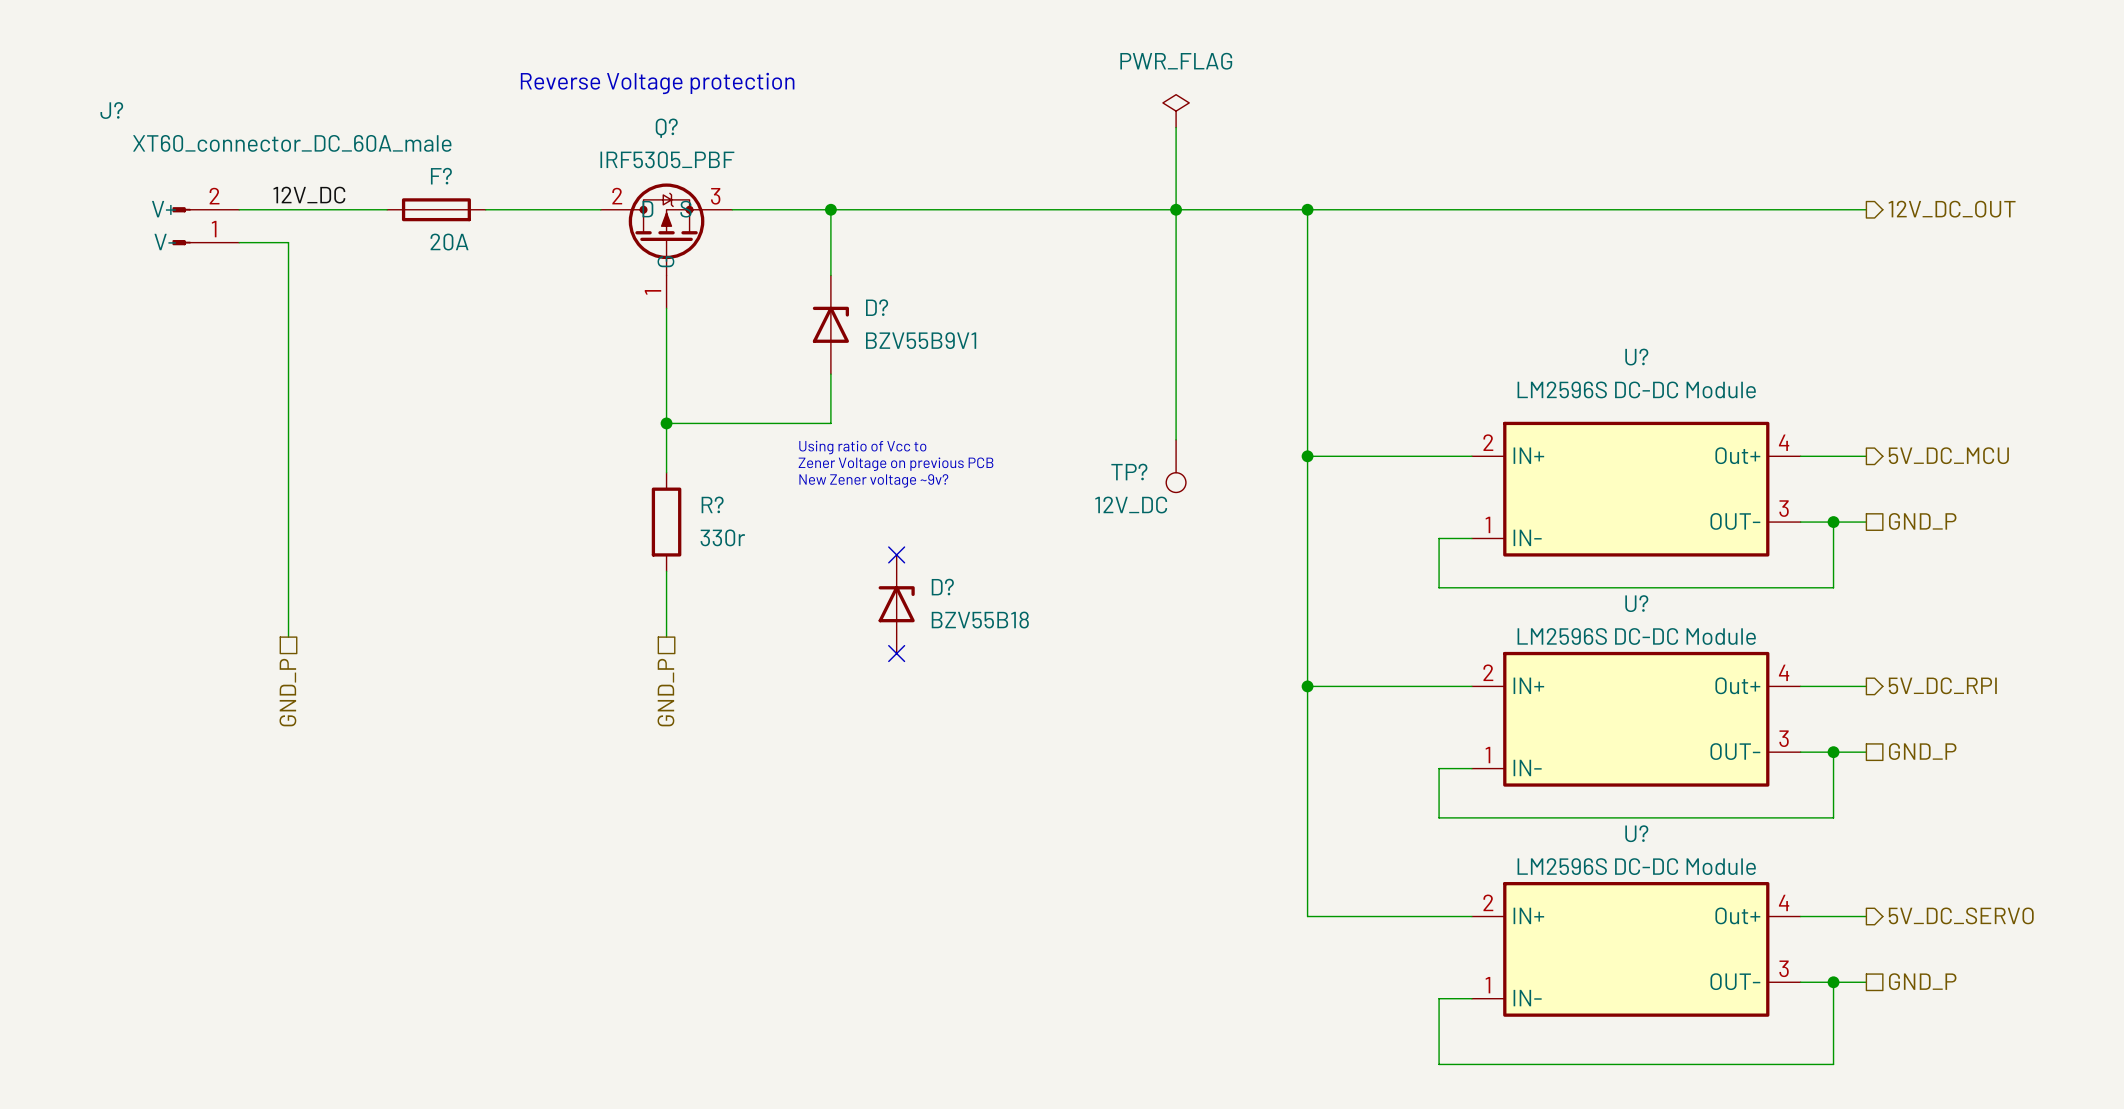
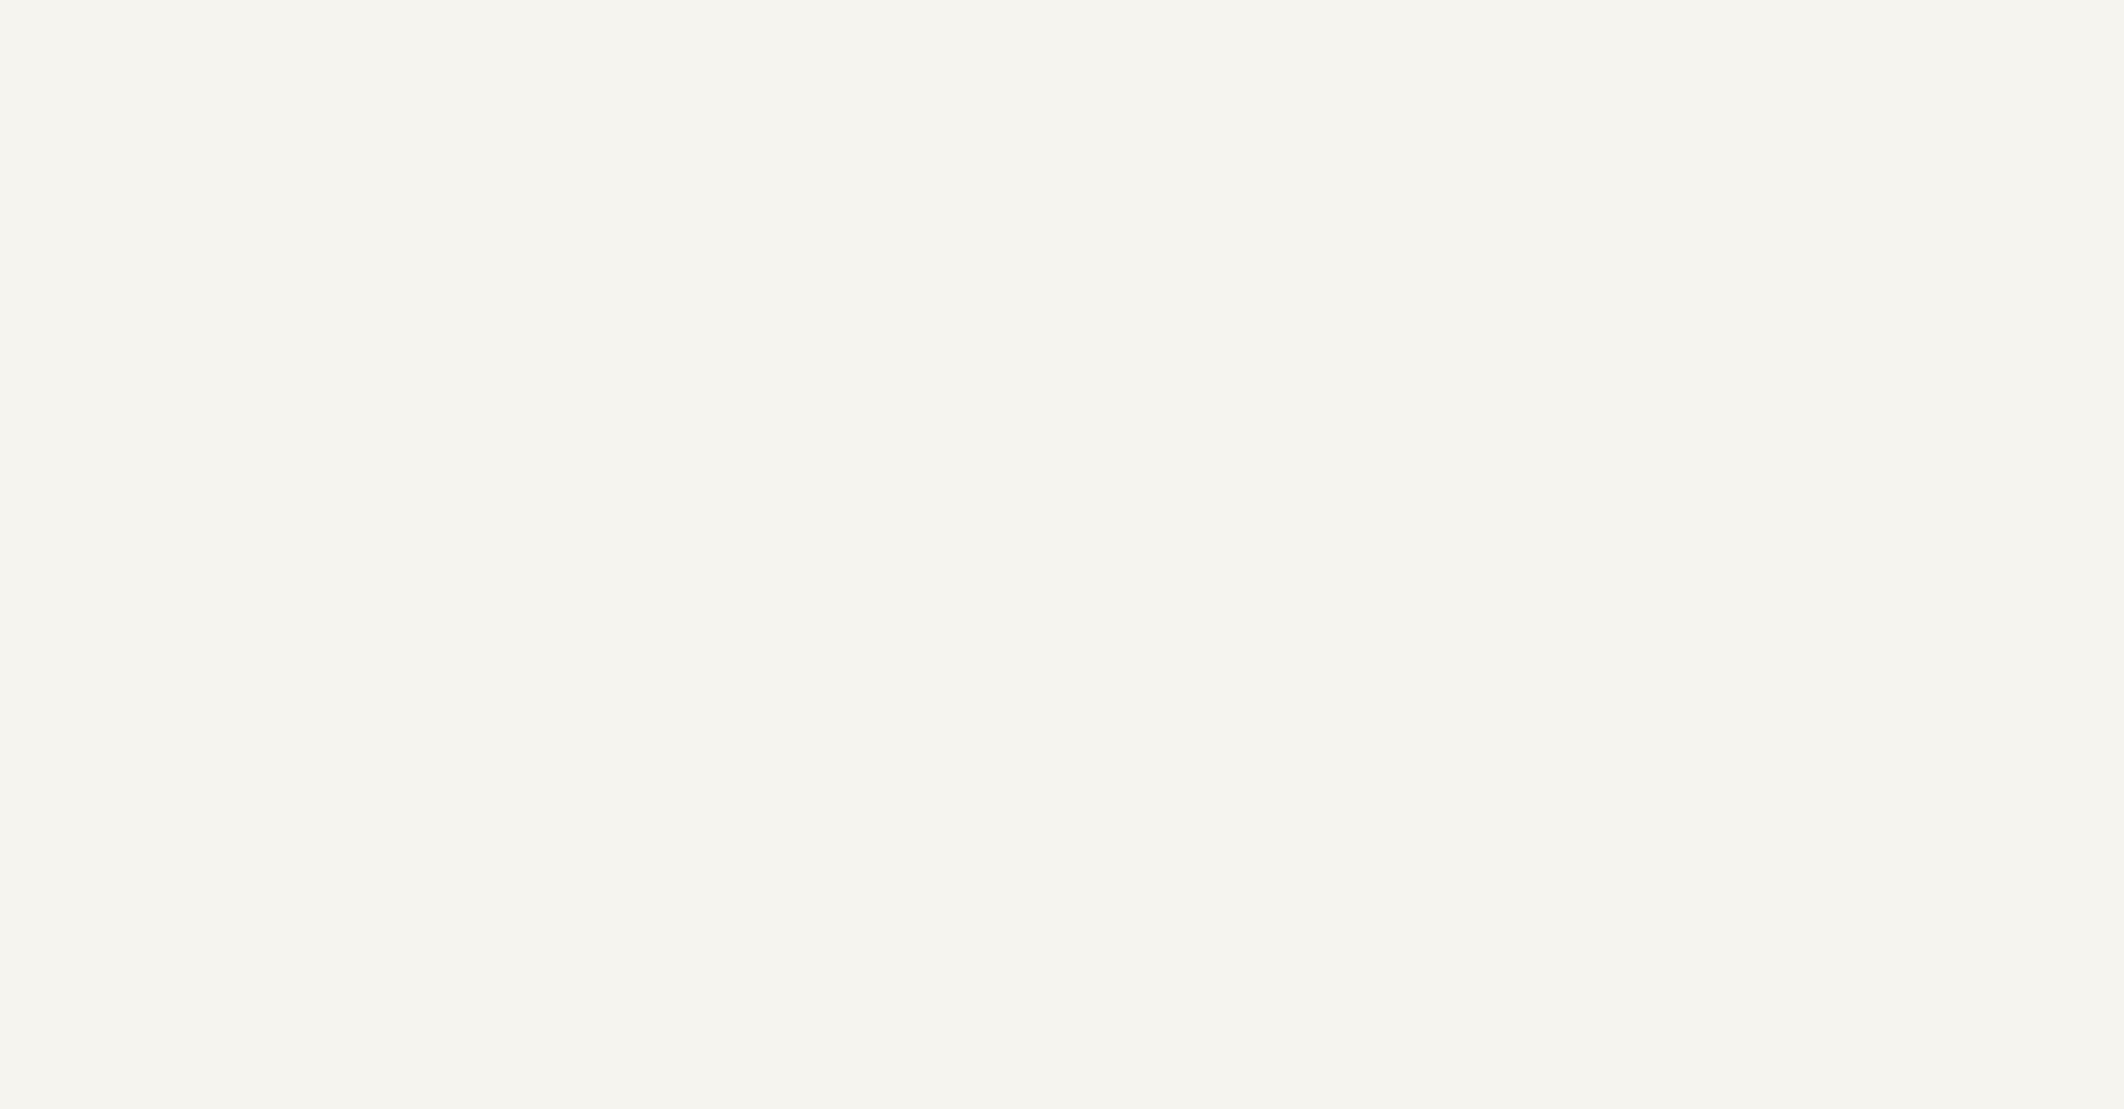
text: Reverse Voltage protection (657, 83) -> none
power symbol: PWR_FLAG (1176, 111) -> none
wire: (1176, 127) (1176, 439) -> none
label: 12V_DC (309, 195) -> none
wire: (239, 209) (387, 209) -> none
F?: 20A (436, 209) -> none
wire: (485, 209) (600, 209) -> none
wire: (732, 209) (1866, 209) -> none
wire: (830, 209) (830, 275) -> none
junction: (830, 209) -> none
junction: (1176, 209) -> none
wire: (1307, 209) (1307, 916) (1471, 916) -> none
junction: (1307, 209) -> none
hierarchical label: 12V_DC_OUT (1952, 209) -> none
J?: XT60_connector_DC_60A_male (205, 226) -> none
wire: (239, 242) (288, 242) (288, 637) -> none
Q?: IRF5305_PBF (666, 245) -> none
wire: (666, 308) (666, 472) -> none
D?: BZV55B9V1 (830, 324) -> none
wire: (830, 374) (830, 423) (666, 423) -> none
junction: (666, 423) -> none
text: Using ratio of Vcc to (862, 447) -> none
hierarchical label: 5V_DC_MCU (1948, 455) -> none
wire: (1307, 456) (1471, 456) -> none
junction: (1307, 456) -> none
wire: (1800, 456) (1866, 456) -> none
text: Zener Voltage on previous PCB (896, 464) -> none
TP?: 12V_DC (1176, 466) -> none
text: New Zener voltage ~9v? (873, 480) -> none
U?: LM2596S DC-DC Module (1636, 489) -> none
hierarchical label: GND_P (1922, 521) -> none
R?: 330r (666, 522) -> none
wire: (1800, 522) (1866, 522) -> none
wire: (1833, 522) (1833, 587) (1439, 587) (1439, 538) (1471, 538) -> none
junction: (1833, 522) -> none
no-connect mark: (896, 554) -> none
wire: (666, 571) (666, 637) -> none
D?: BZV55B18 (896, 604) -> none
no-connect mark: (896, 653) -> none
hierarchical label: 5V_DC_RPI (1942, 685) -> none
wire: (1307, 686) (1471, 686) -> none
junction: (1307, 686) -> none
wire: (1800, 686) (1866, 686) -> none
hierarchical label: GND_P (287, 692) -> none
hierarchical label: GND_P (665, 692) -> none
U?: LM2596S DC-DC Module (1636, 719) -> none
hierarchical label: GND_P (1922, 751) -> none
wire: (1800, 752) (1866, 752) -> none
wire: (1833, 752) (1833, 817) (1439, 817) (1439, 768) (1471, 768) -> none
junction: (1833, 752) -> none
hierarchical label: 5V_DC_SERVO (1961, 915) -> none
wire: (1800, 916) (1866, 916) -> none
U?: LM2596S DC-DC Module (1636, 949) -> none
hierarchical label: GND_P (1922, 981) -> none
wire: (1800, 982) (1866, 982) -> none
wire: (1833, 982) (1833, 1064) (1439, 1064) (1439, 998) (1471, 998) -> none
junction: (1833, 982) -> none

